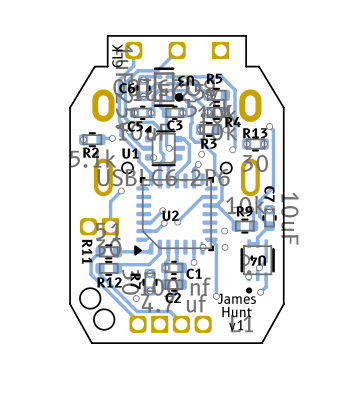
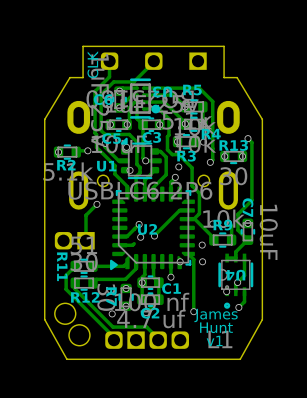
track: (164, 223) (157, 229) -> none

